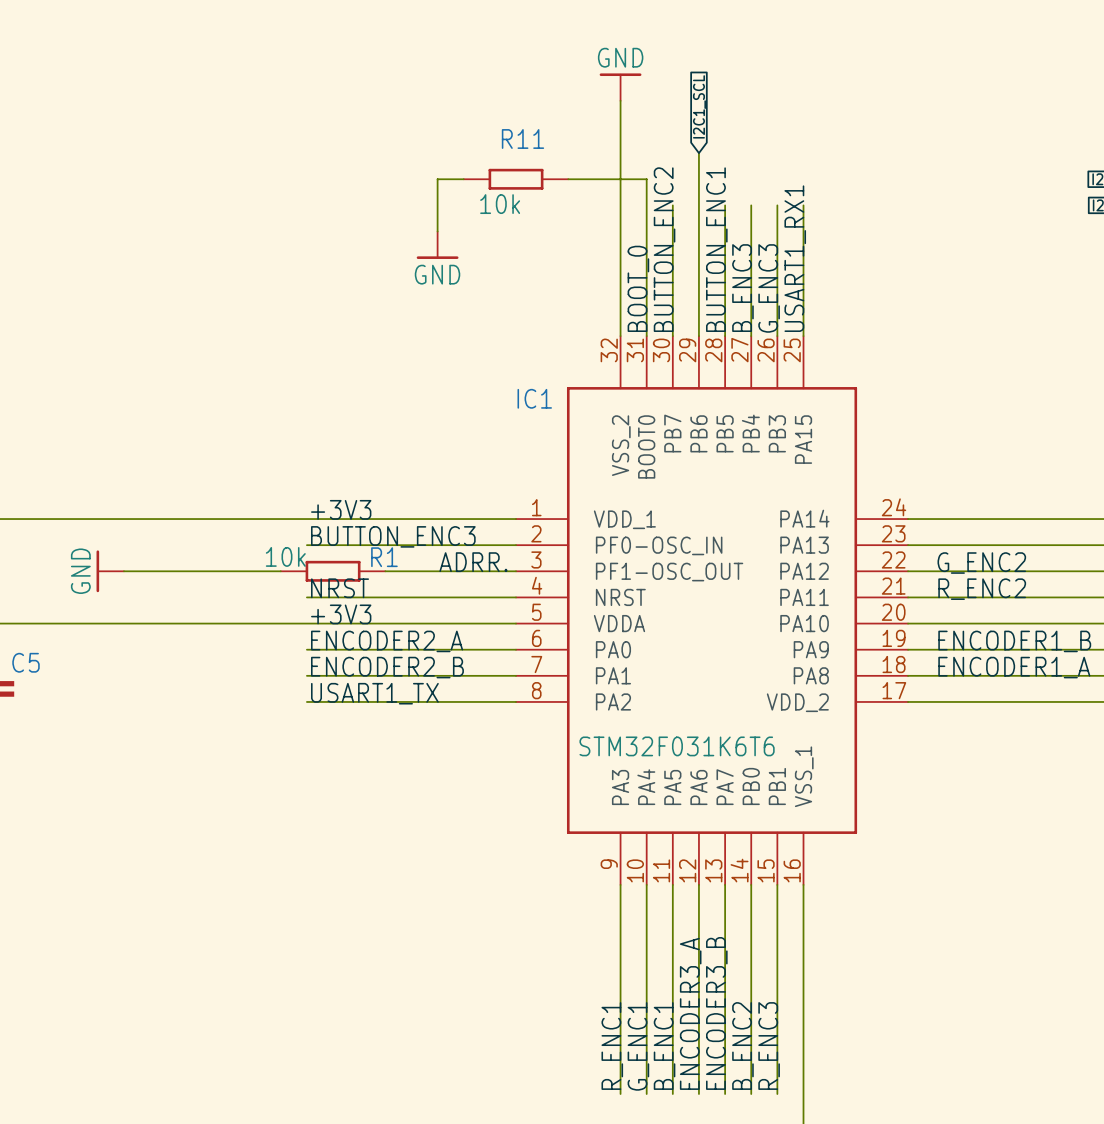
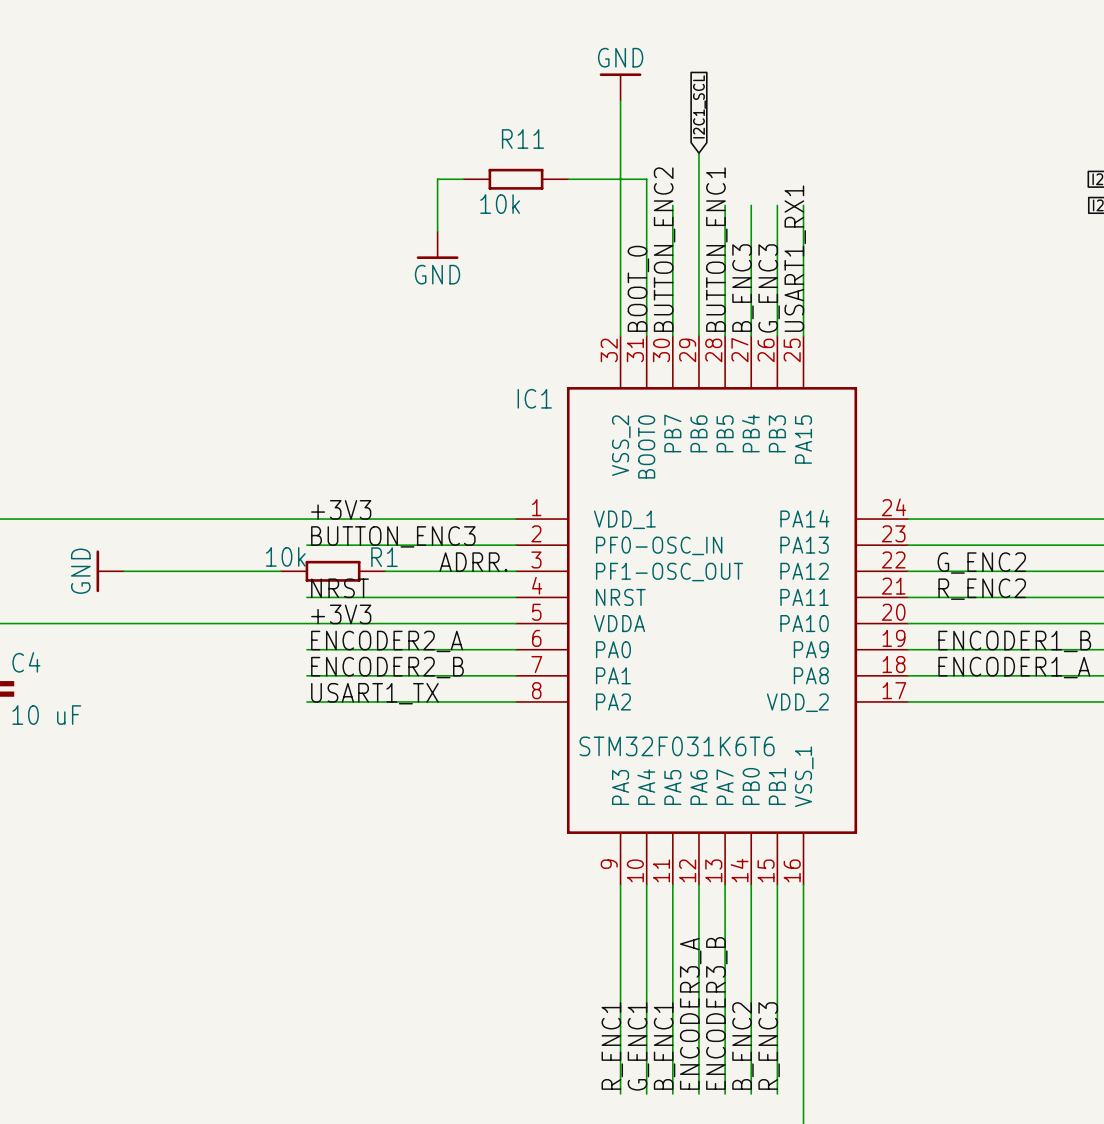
C5 name: C5 (26, 662) -> C4 (26, 662)
C5 value: none -> 10 uF (46, 715)

